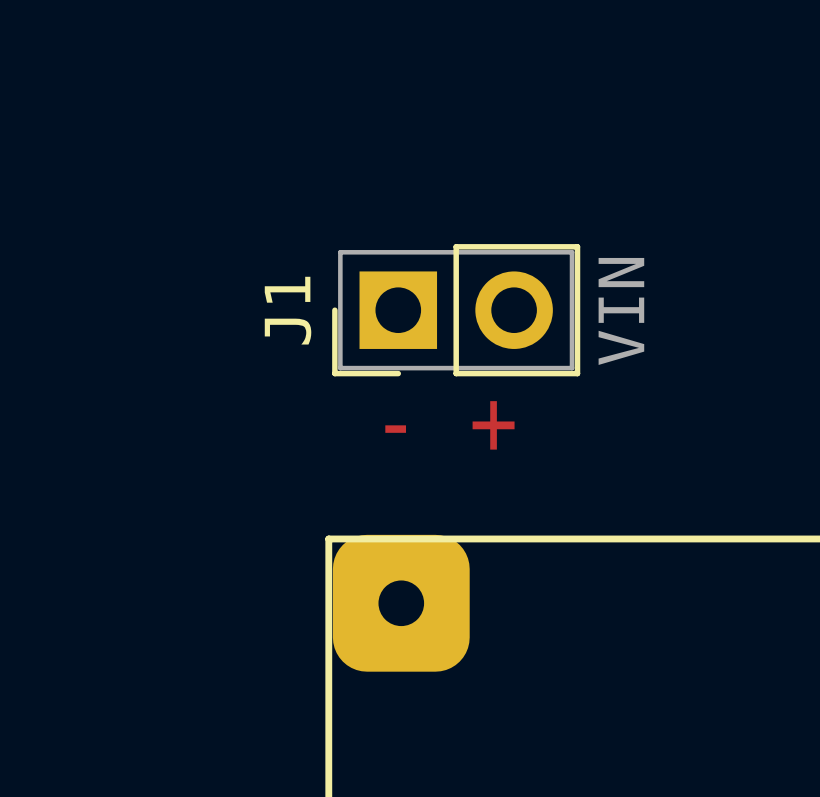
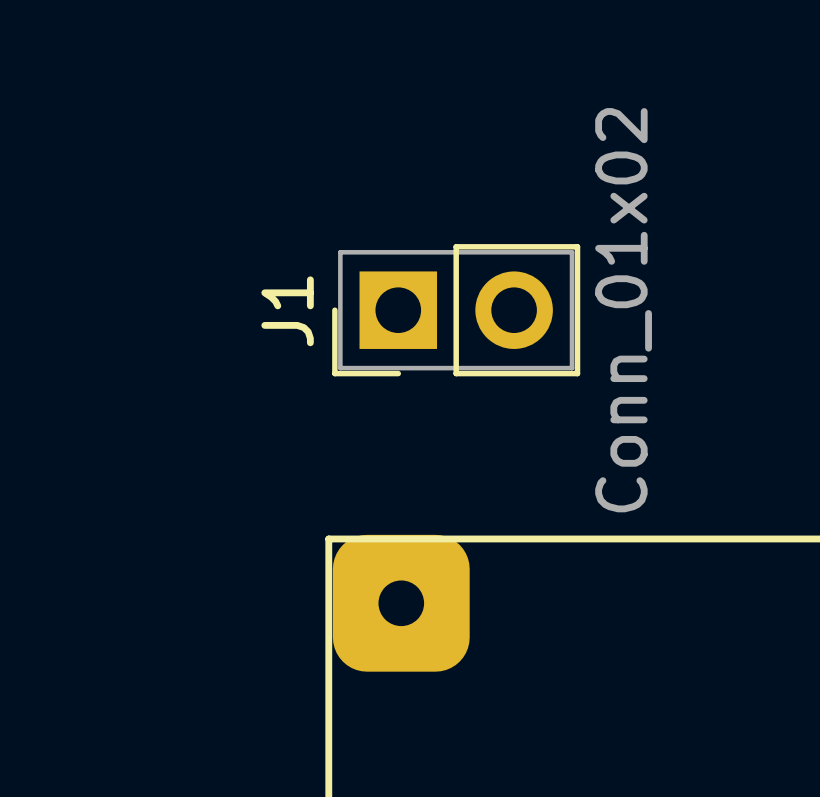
J1 value: VIN (621, 311) -> Conn_01x02 (623, 310)
text: - + (449, 425) -> none

